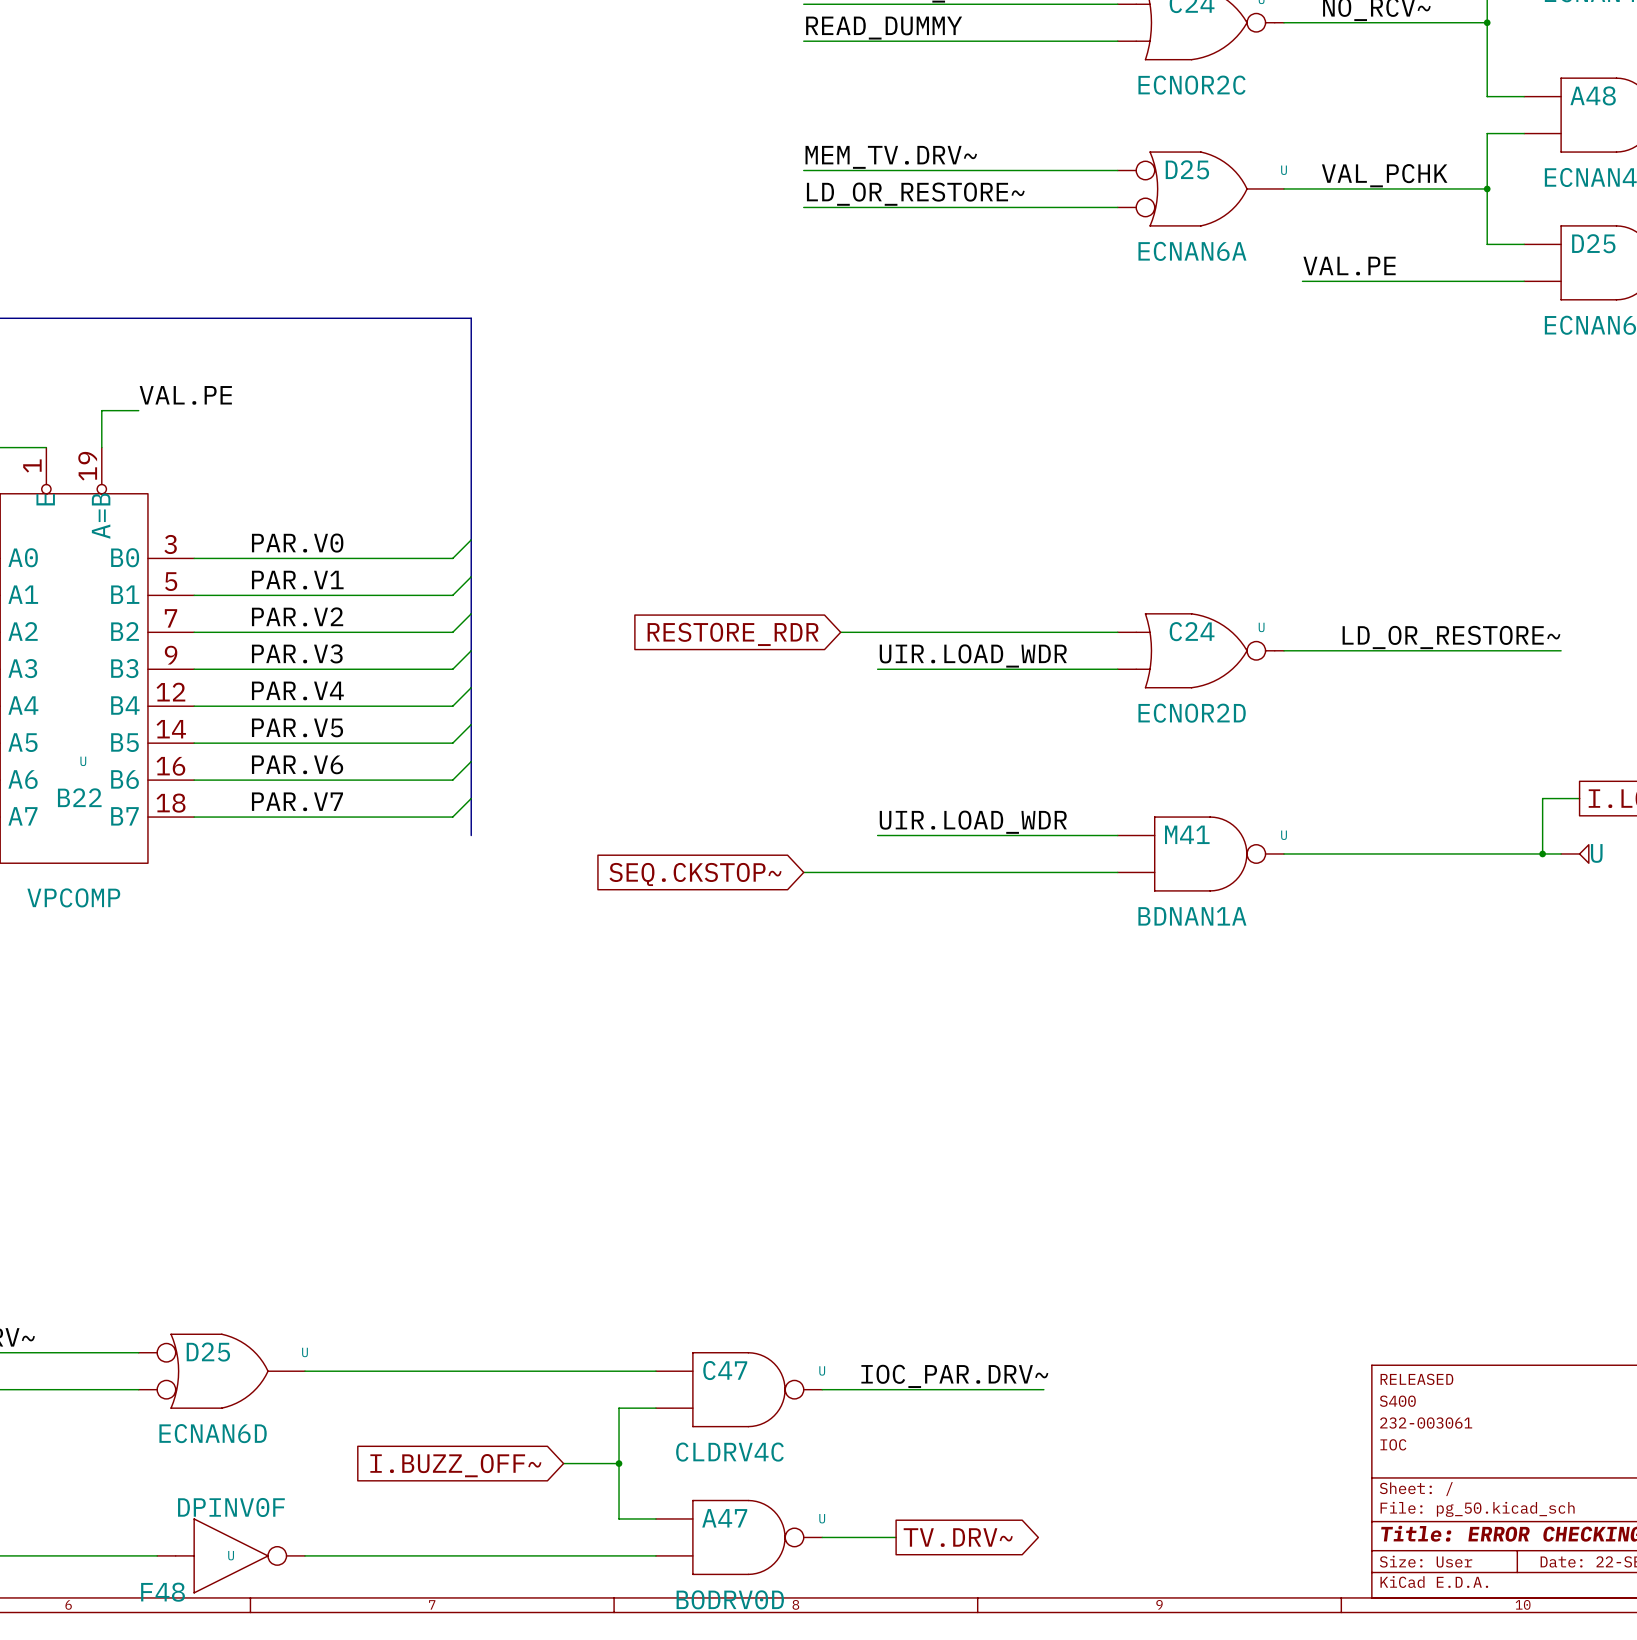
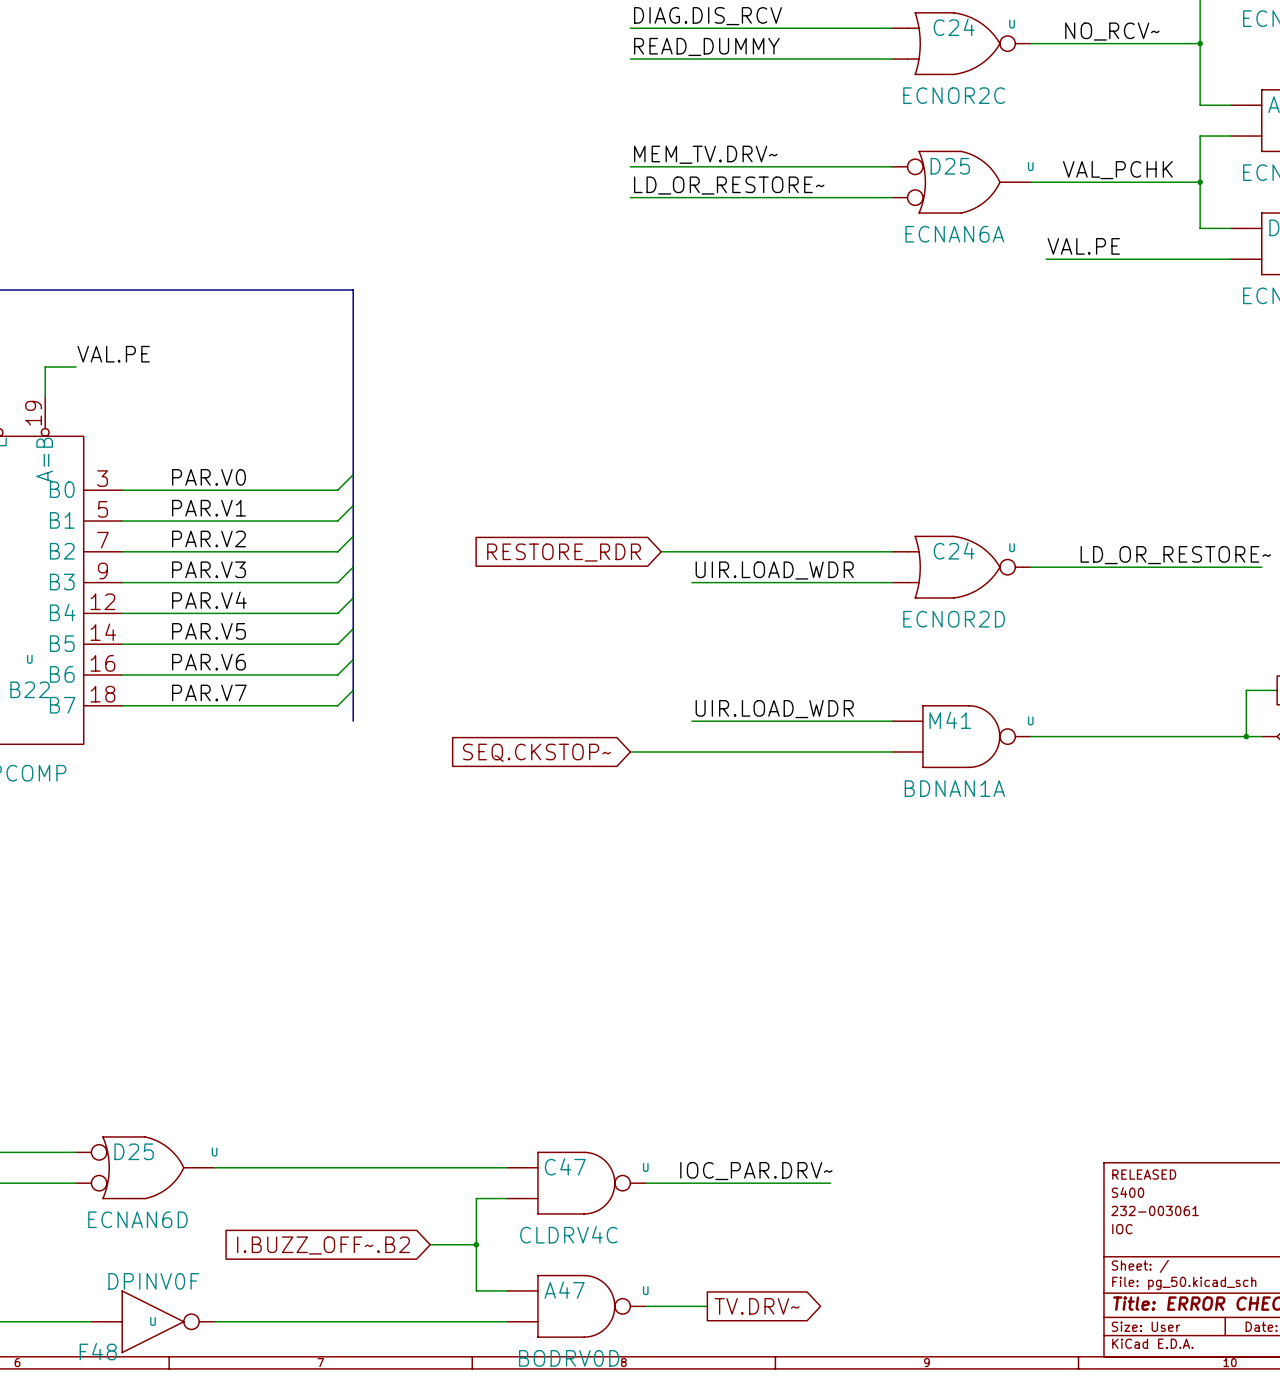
global label: I.BUZZ_OFF~ (455, 1465) -> I.BUZZ_OFF~.B2 (323, 1245)

